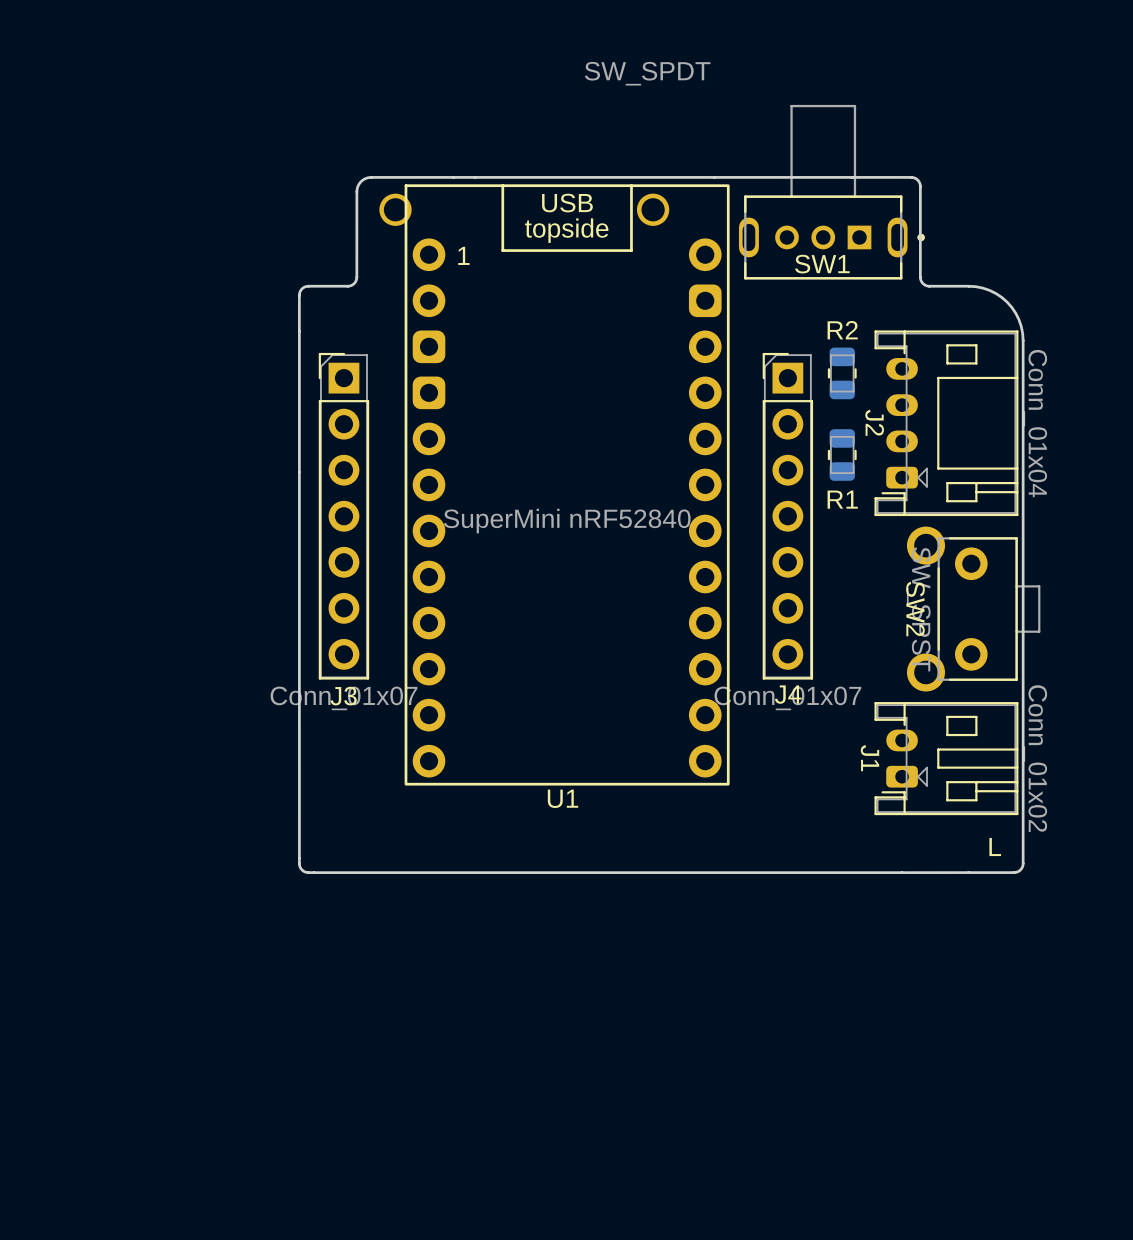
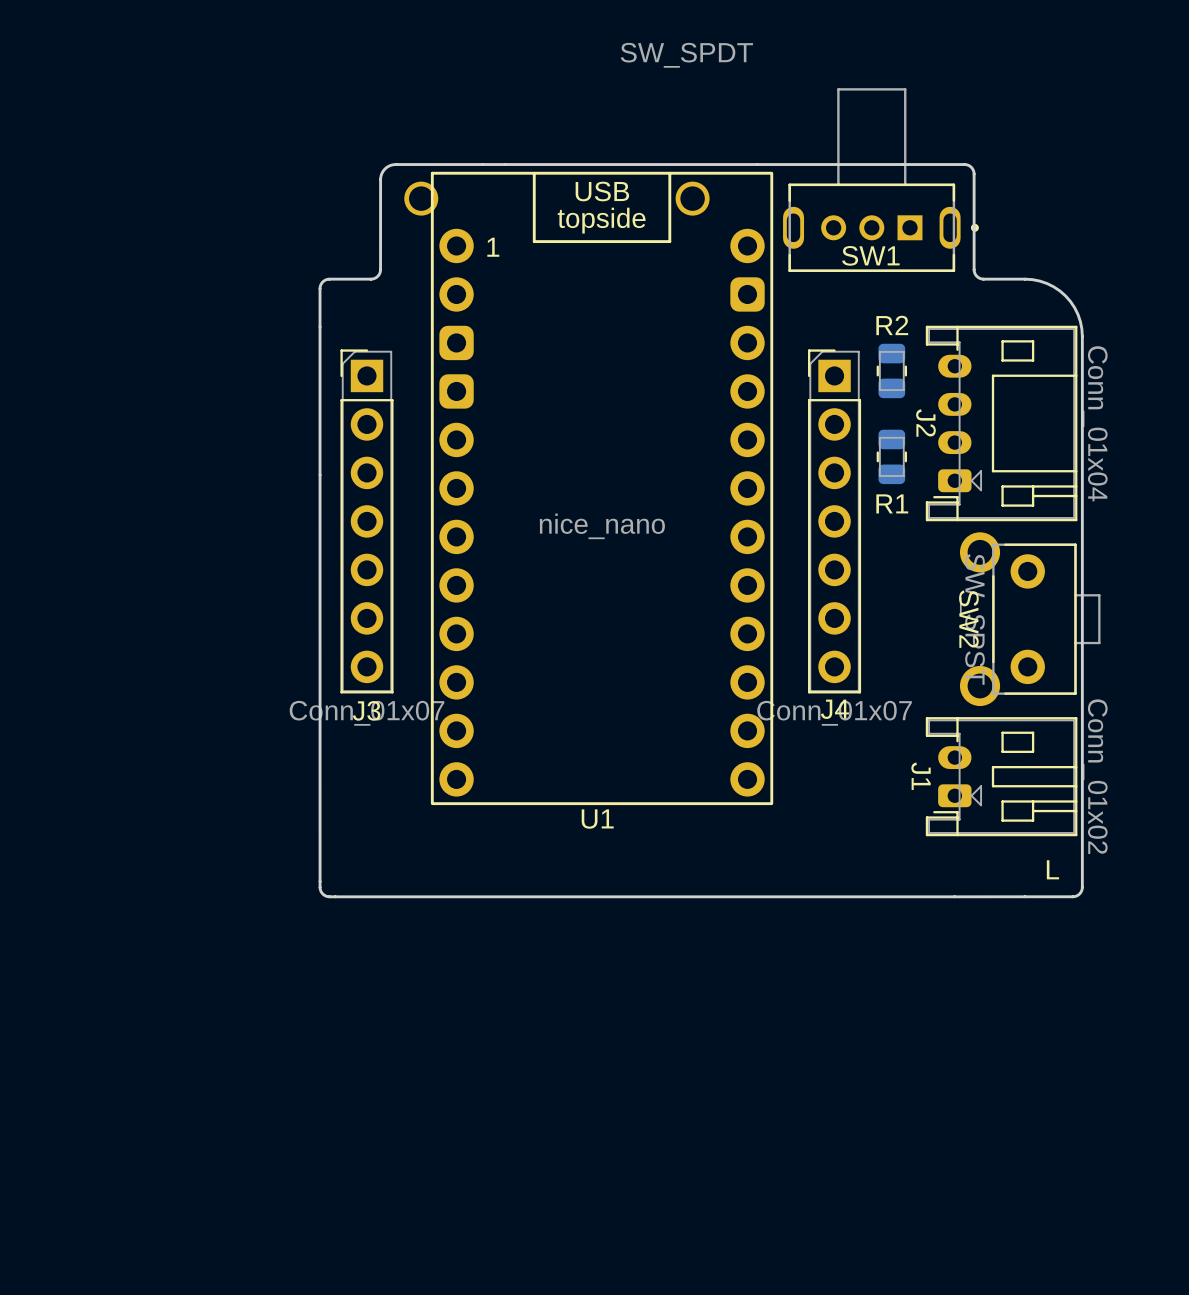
U1 value: SuperMini nRF52840 (567, 521) -> nice_nano (602, 526)

